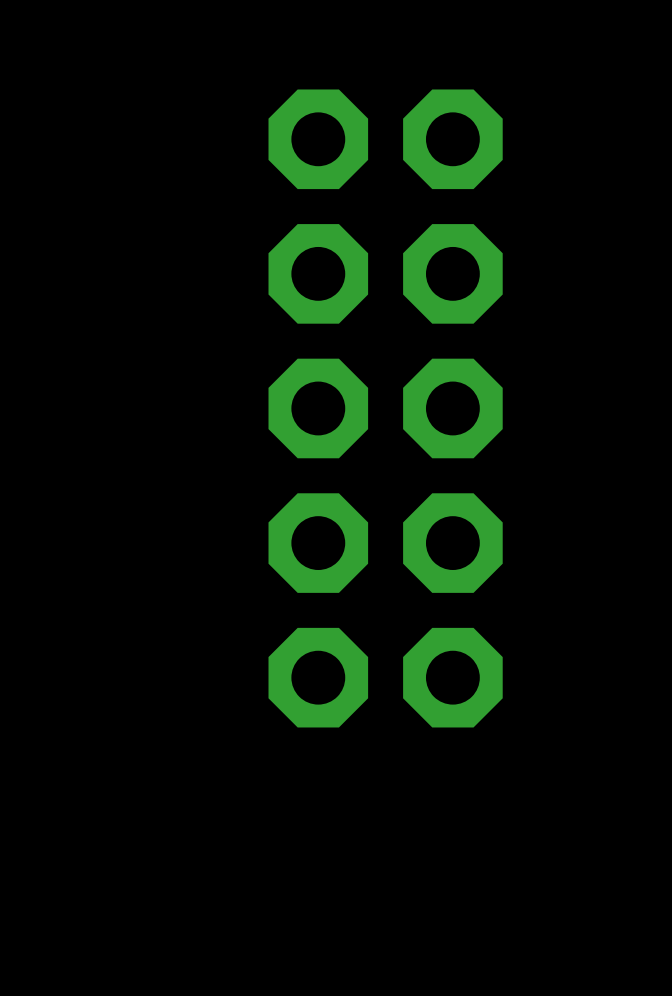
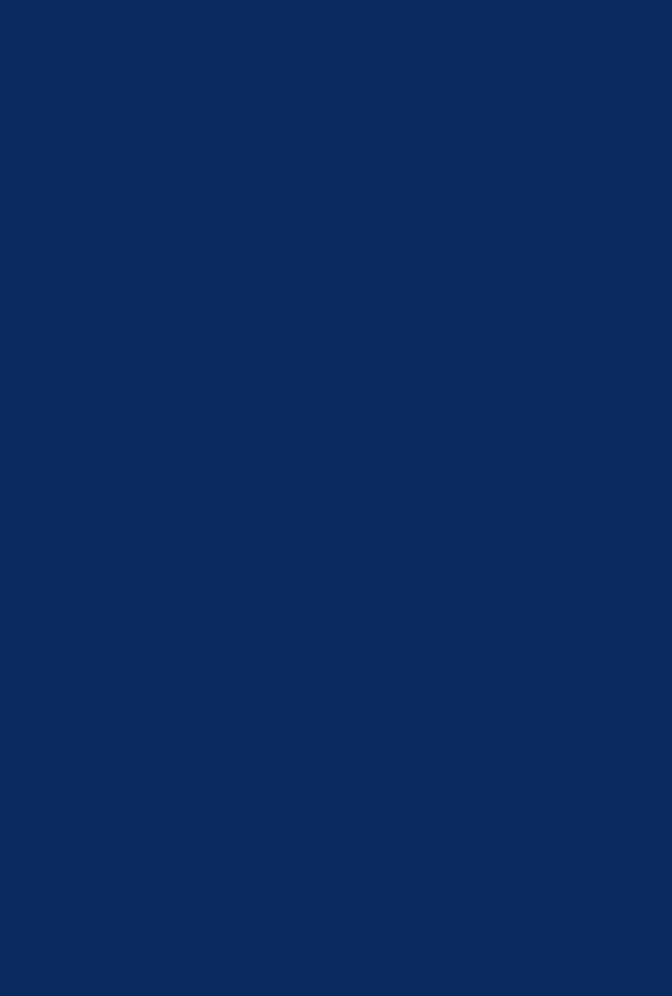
part: (385, 408) -> none

